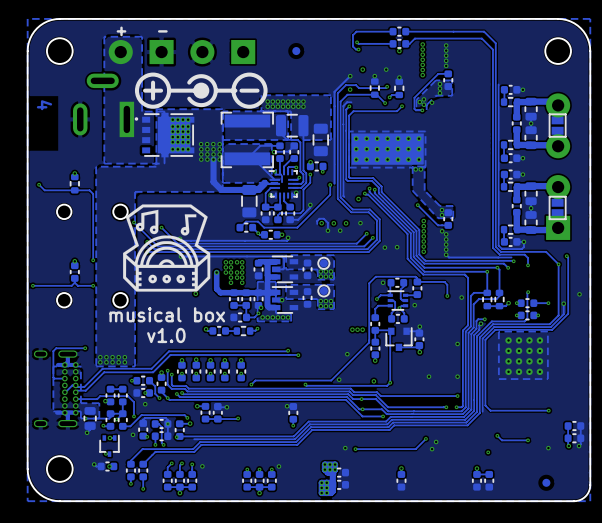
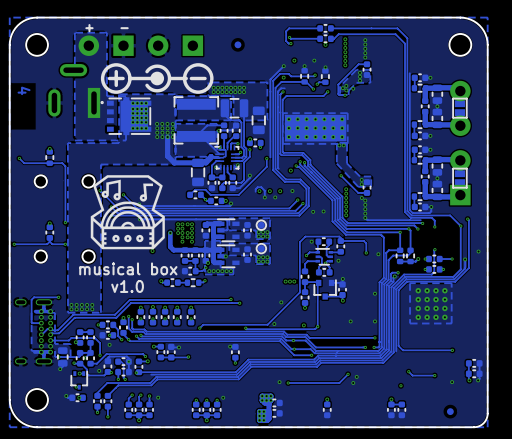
track: none -> (80, 363) (87, 369) (88, 375) (104, 375) (107, 371)

